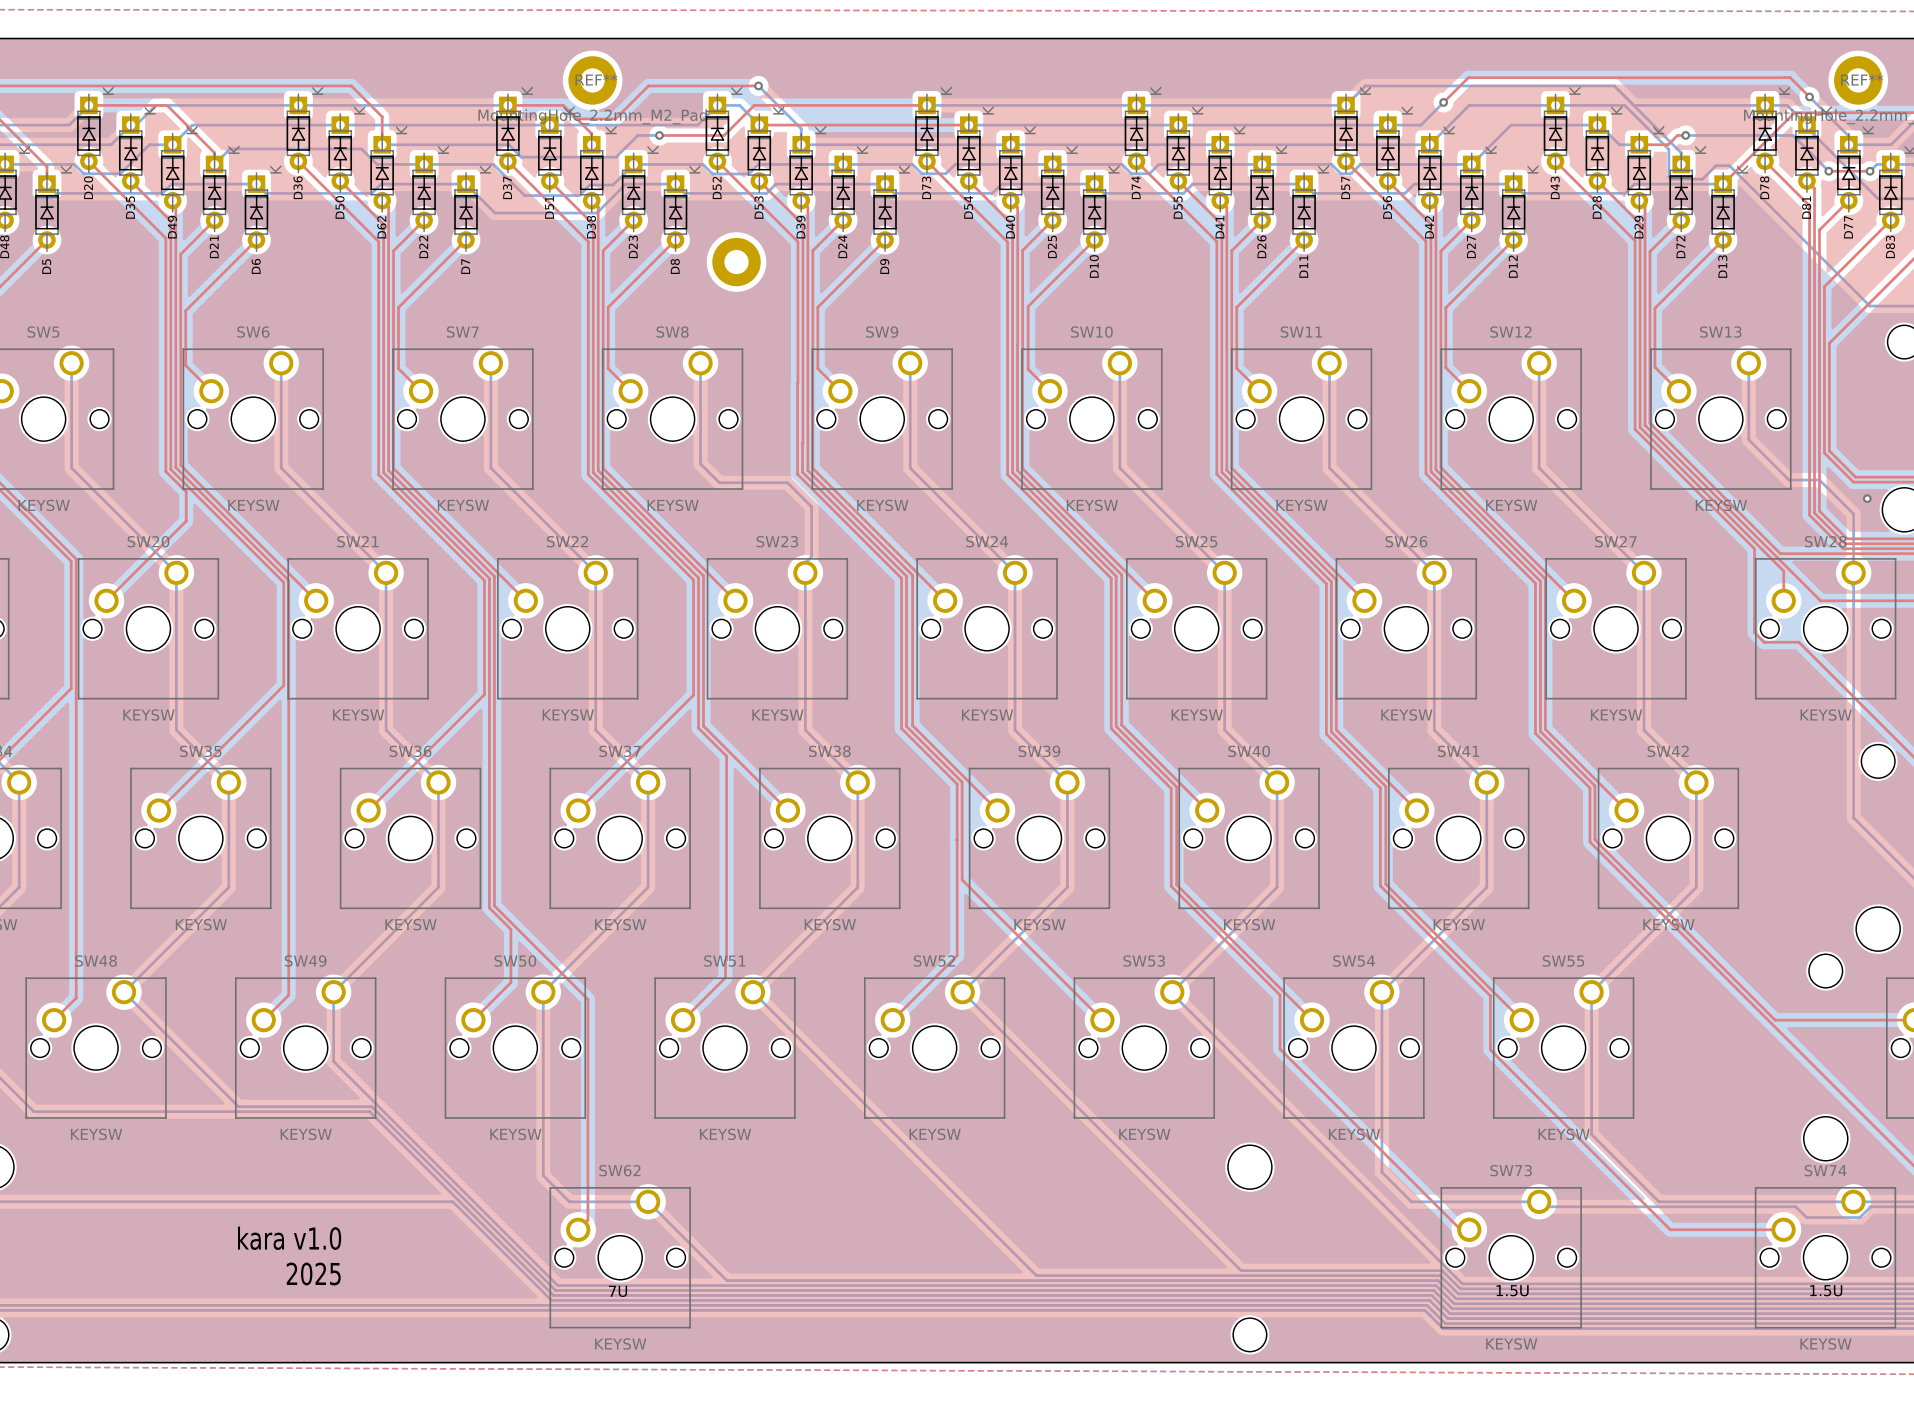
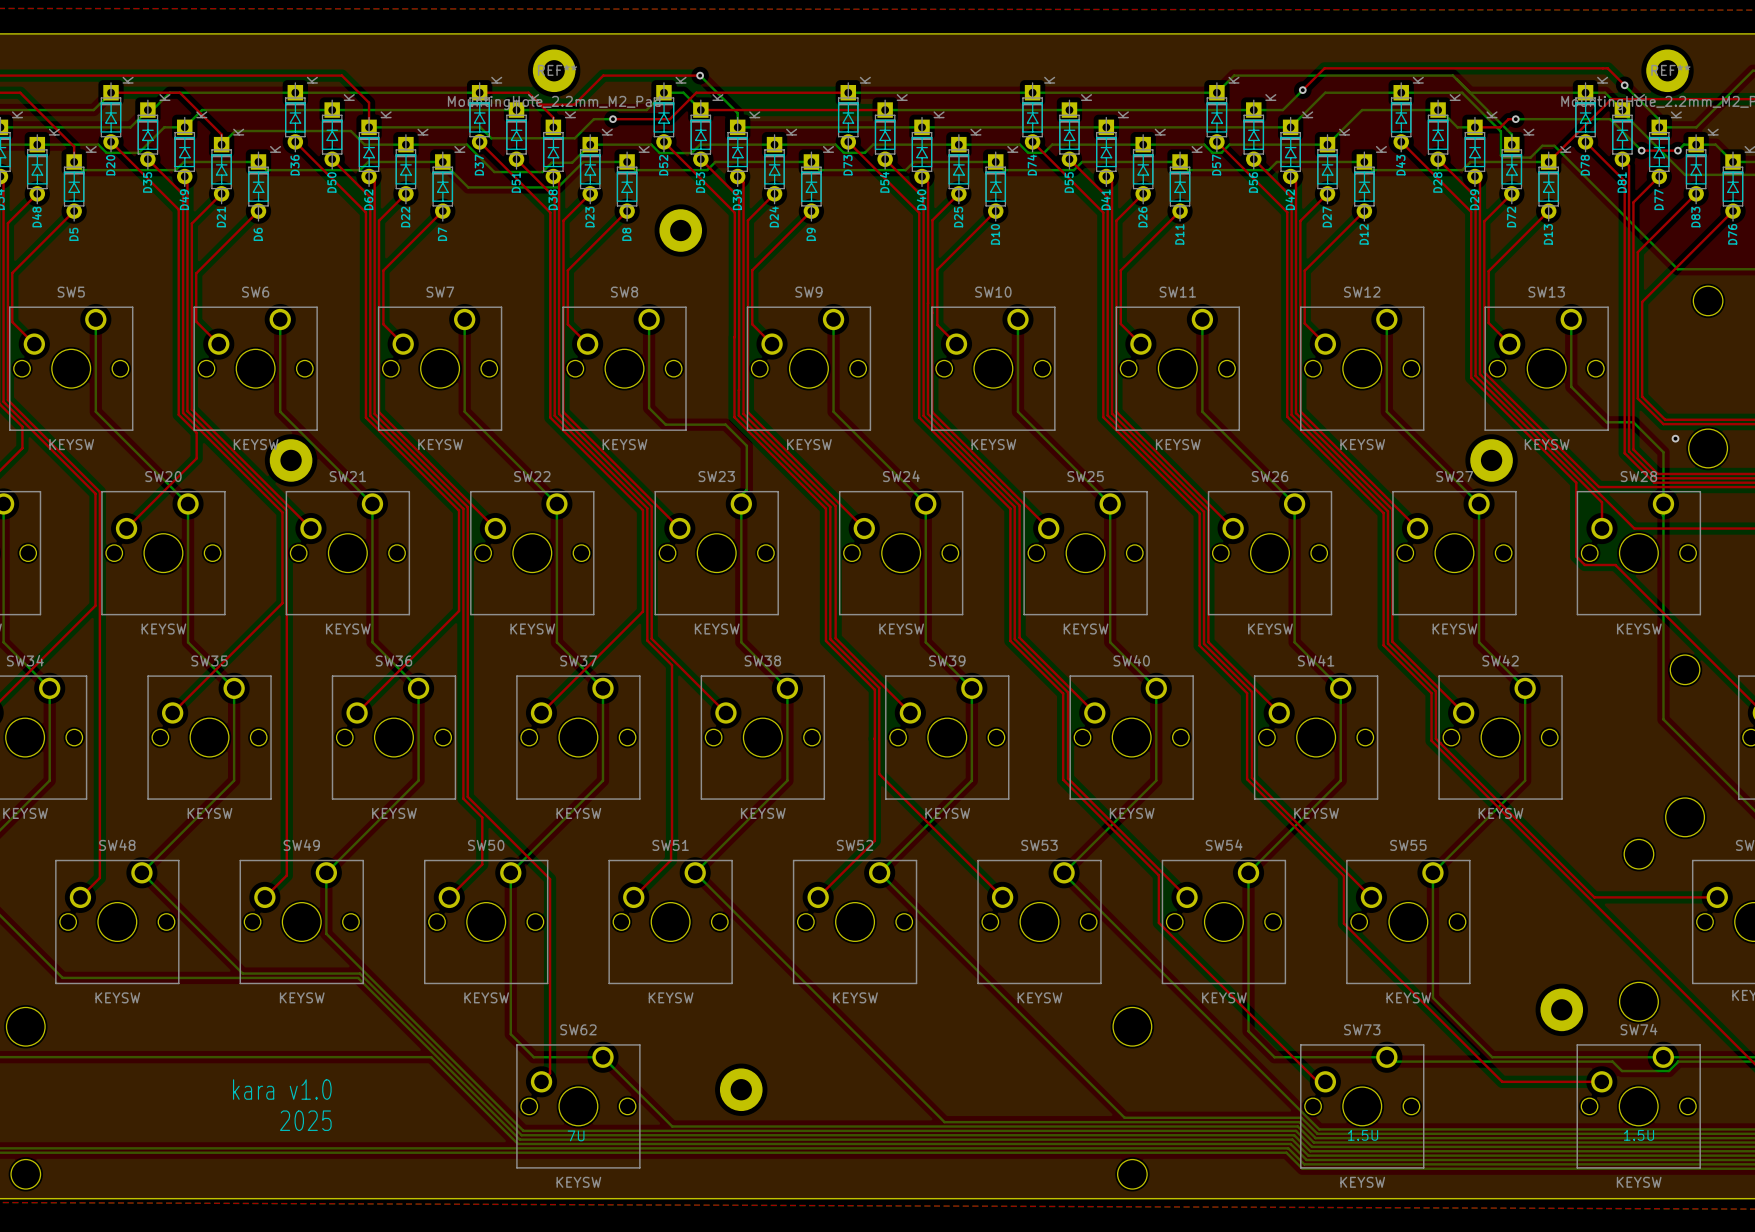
part: none -> (291, 460)
part: none -> (1491, 460)
part: none -> (1561, 1009)
part: none -> (741, 1089)

